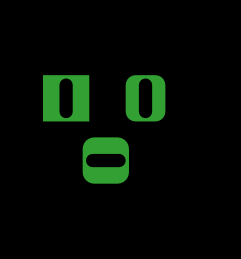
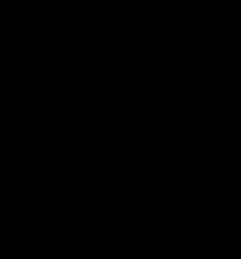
part: (104, 129) -> none

